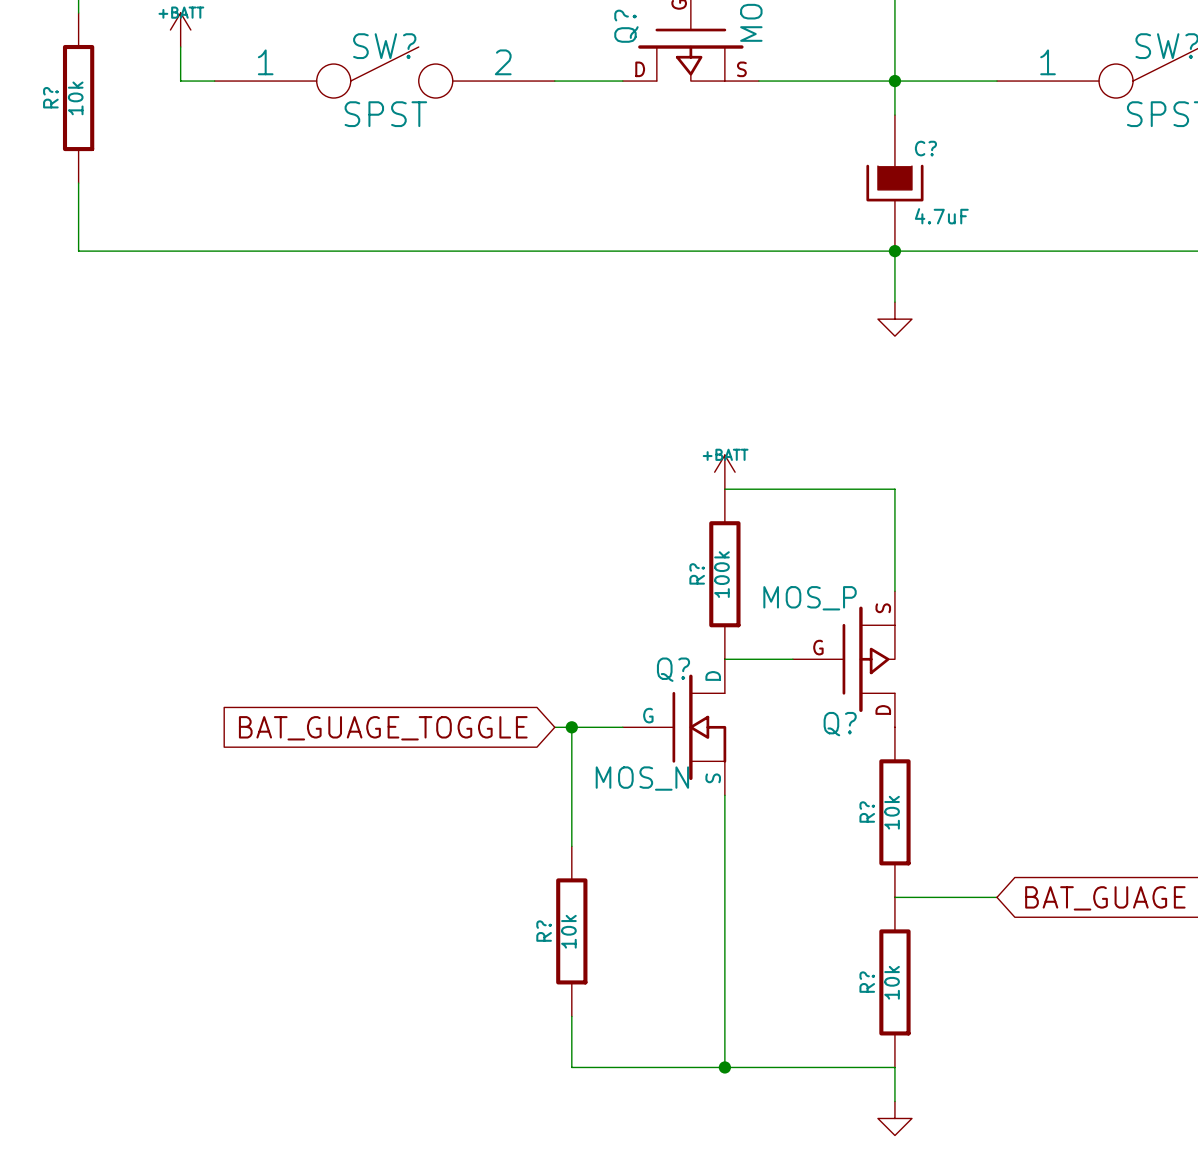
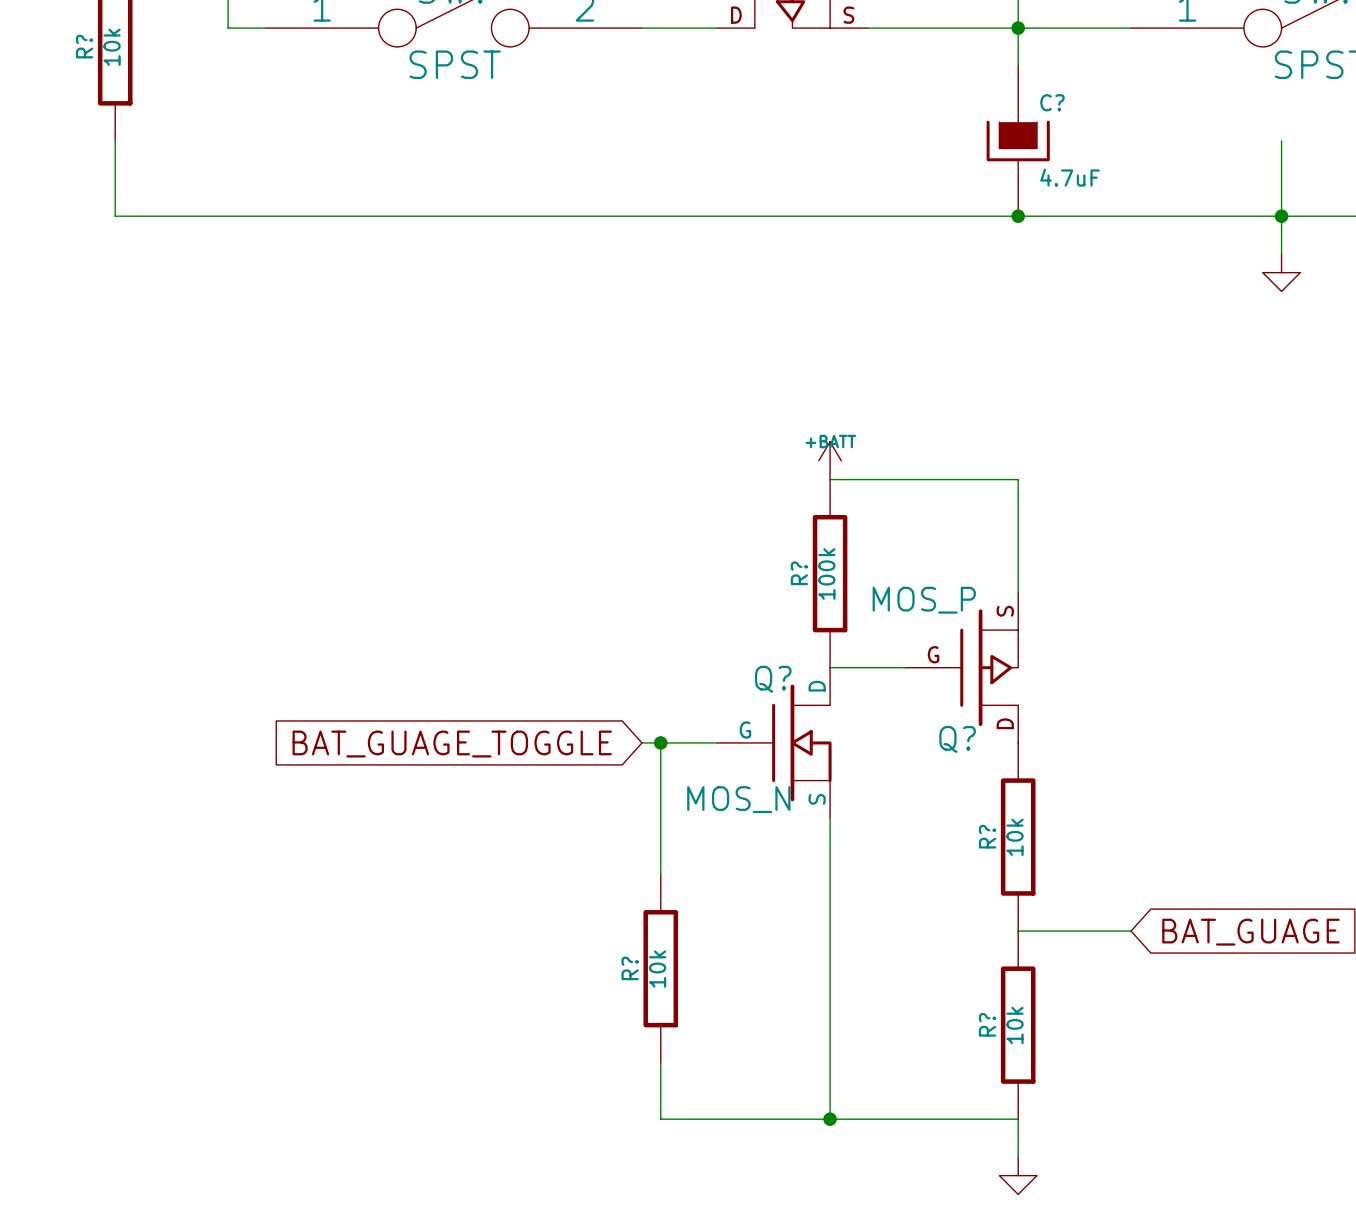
wire: none -> (1281, 140) (1281, 253)
wire: (894, 251) (894, 302) -> none
junction: none -> (1281, 216)
power symbol position: (894, 319) -> (1281, 272)

